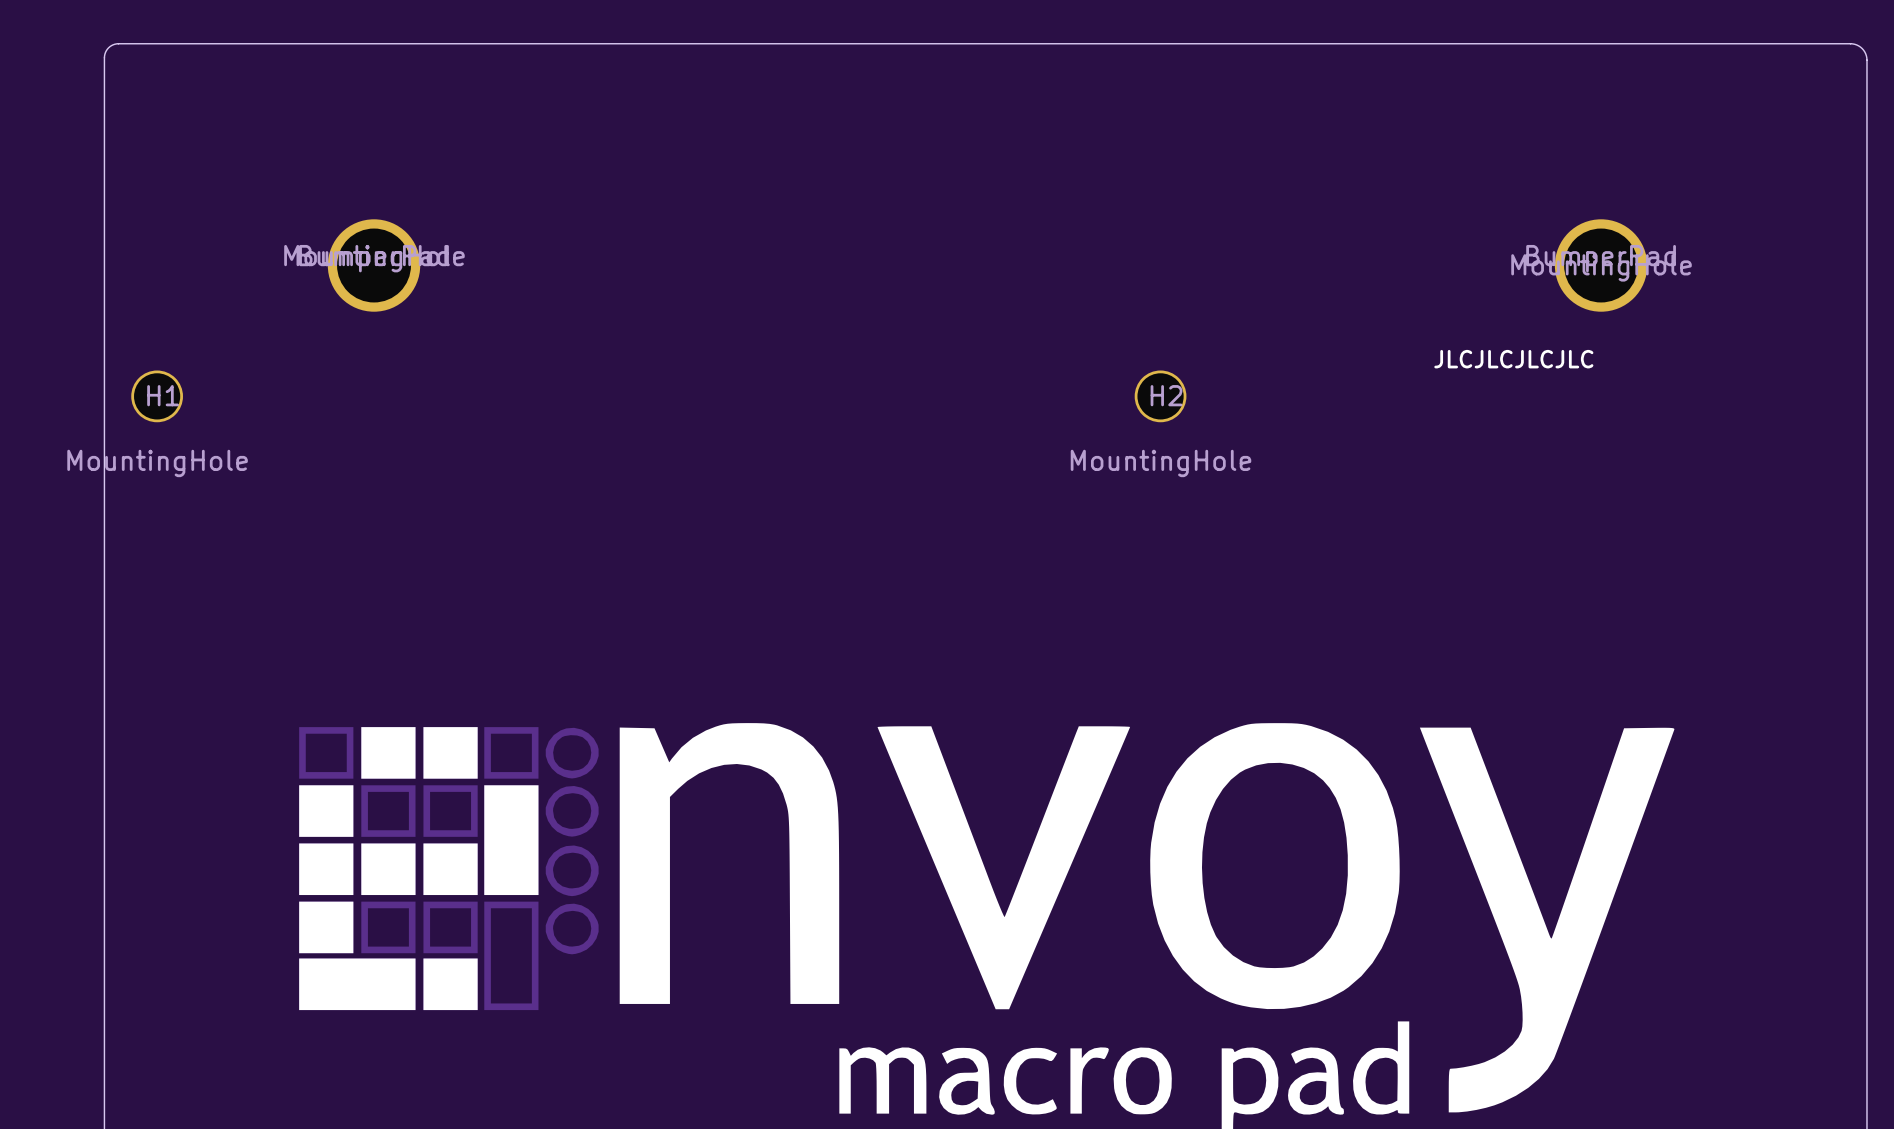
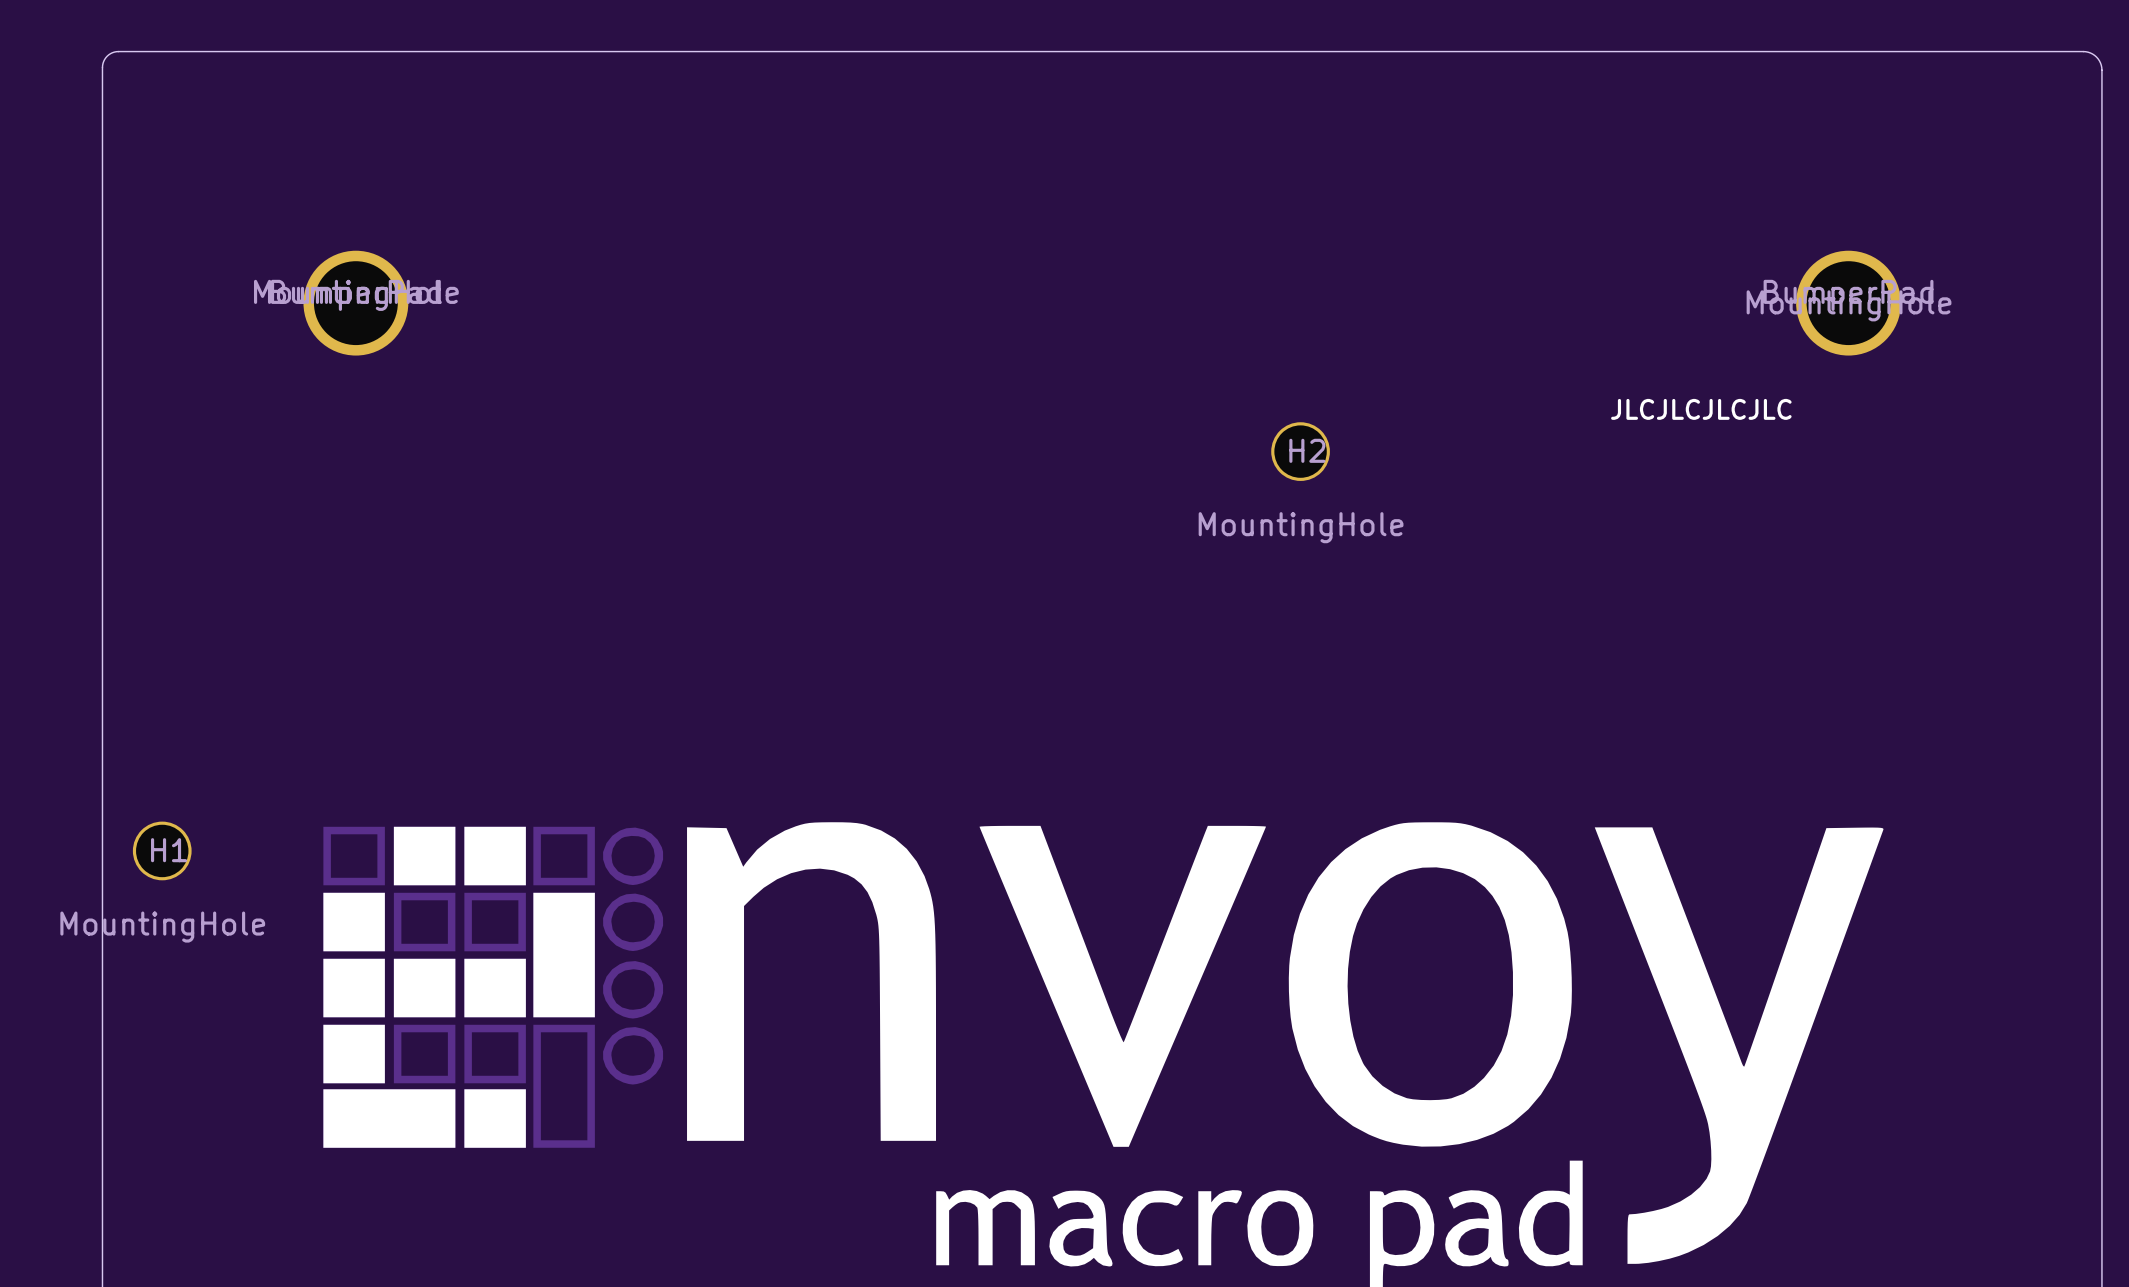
drawing position: (374, 258) -> (355, 295)
drawing position: (1601, 258) -> (1848, 295)
part position: (374, 265) -> (355, 303)
part position: (1601, 265) -> (1848, 303)
H1 position: (157, 396) -> (162, 850)

